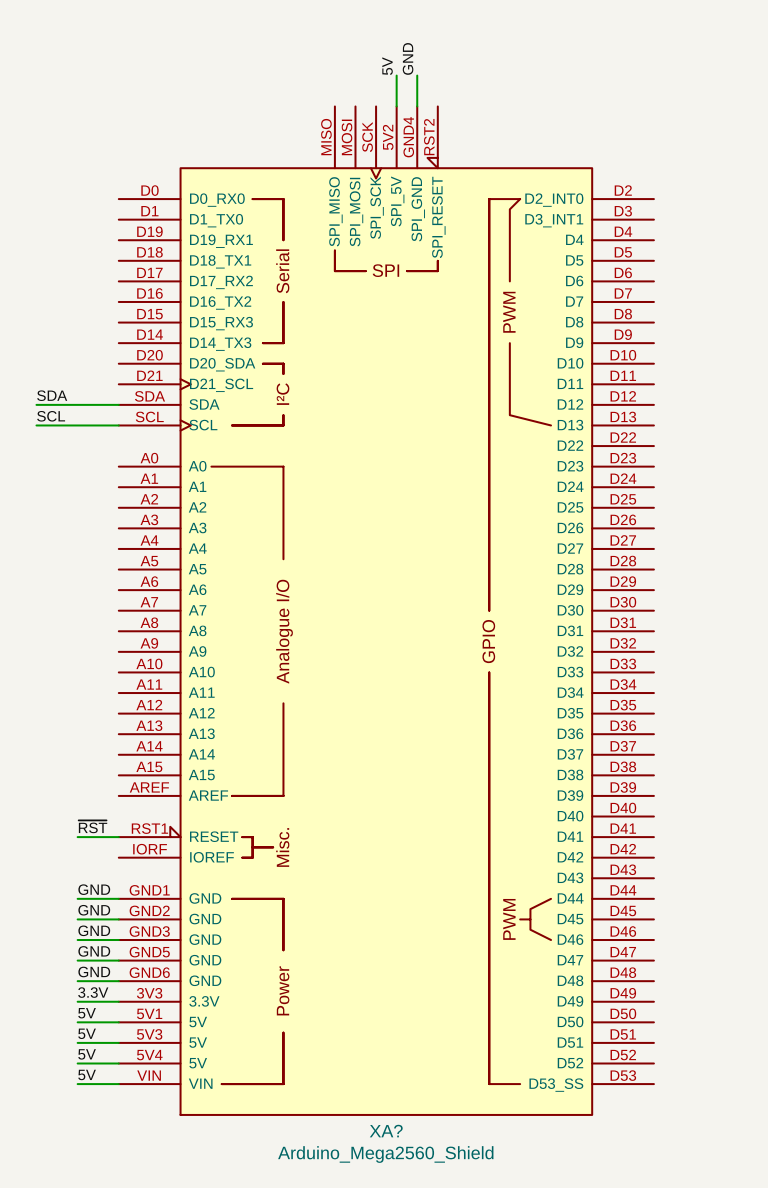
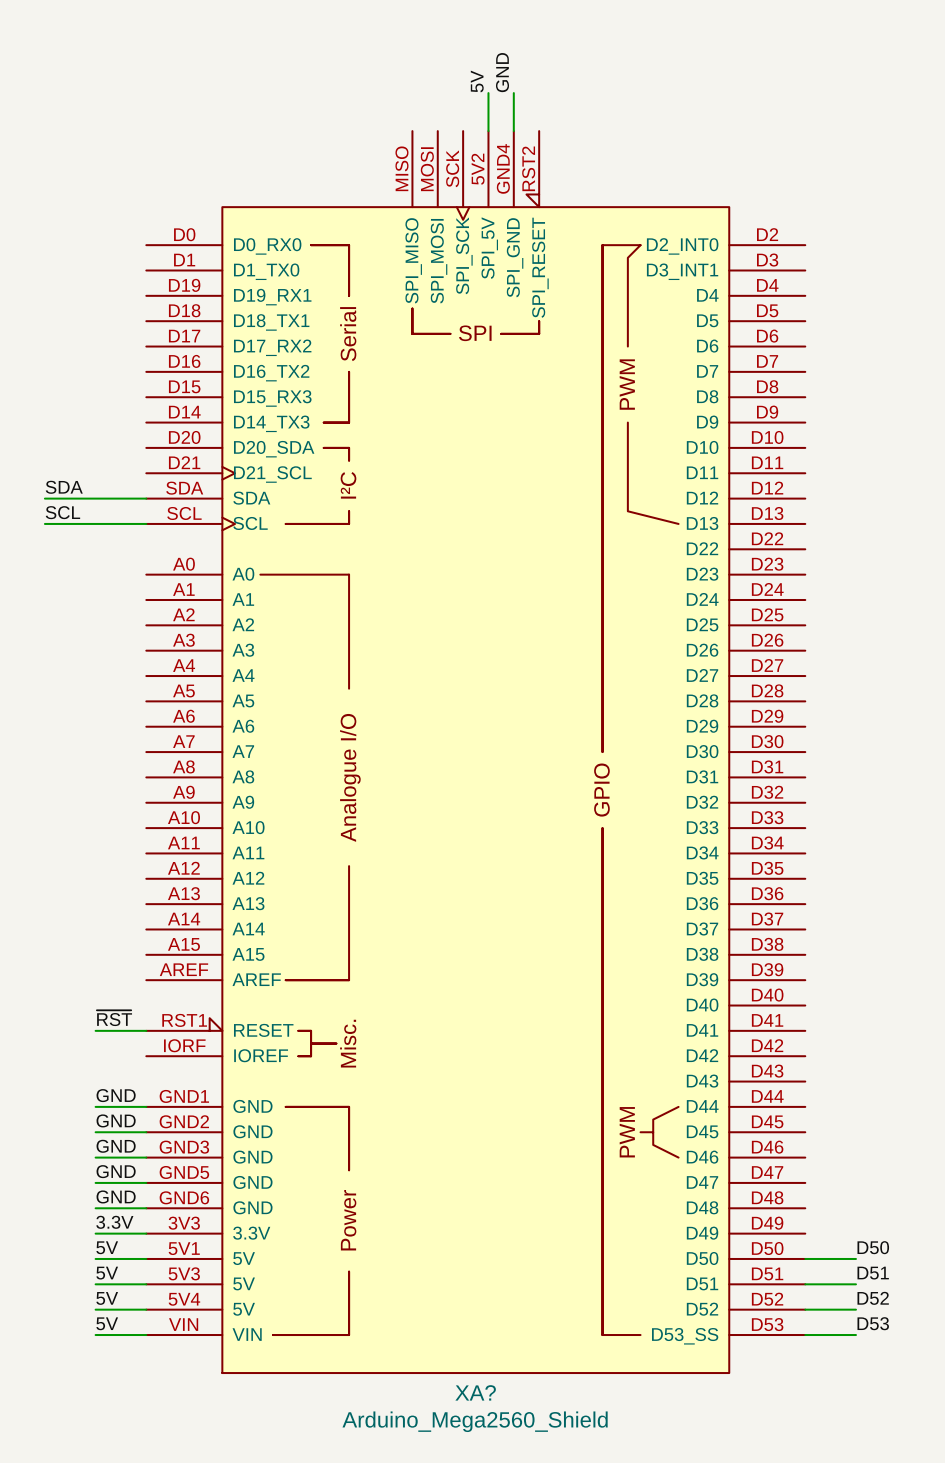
label: none -> D50 (873, 1247)
wire: none -> (805, 1258) (855, 1258)
label: none -> D51 (873, 1273)
wire: none -> (805, 1284) (855, 1284)
label: none -> D52 (873, 1298)
wire: none -> (805, 1309) (855, 1309)
label: none -> D53 (873, 1323)
wire: none -> (805, 1335) (855, 1335)

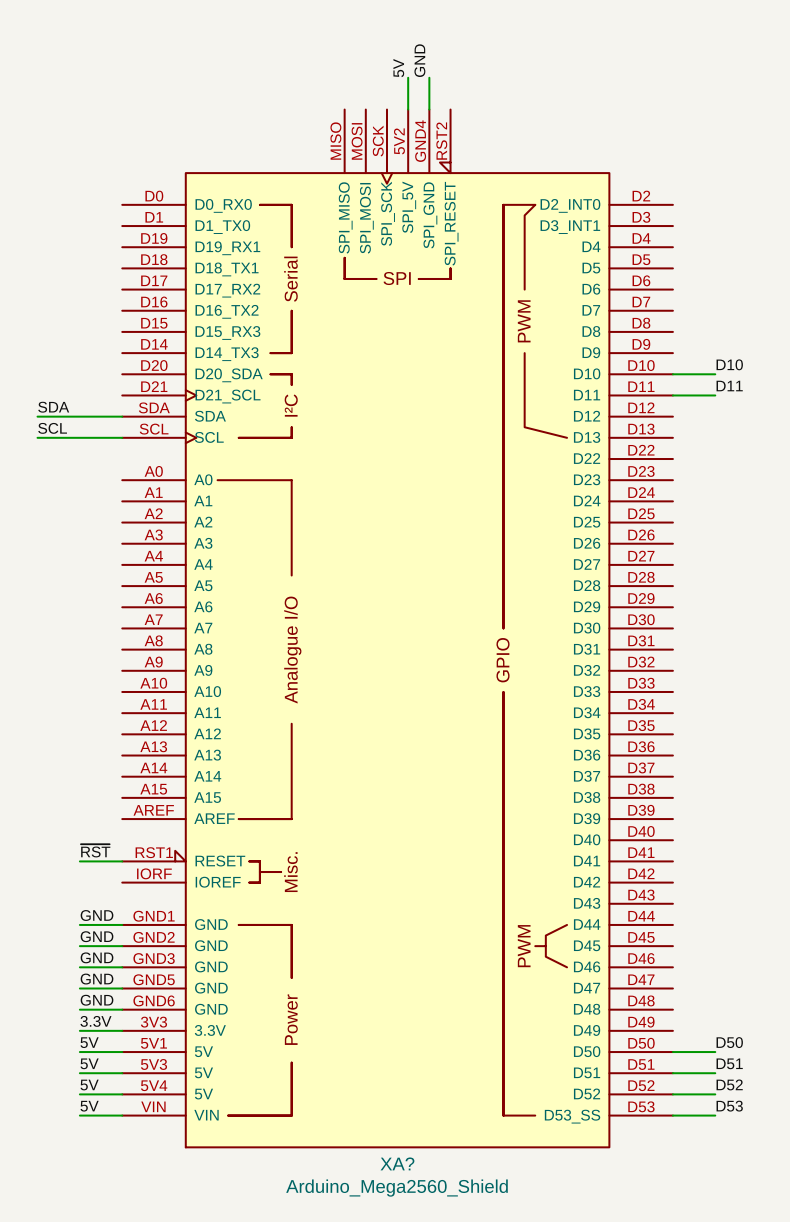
label: none -> D10 (729, 364)
wire: none -> (672, 374) (715, 374)
label: none -> D11 (729, 386)
wire: none -> (672, 395) (715, 395)

